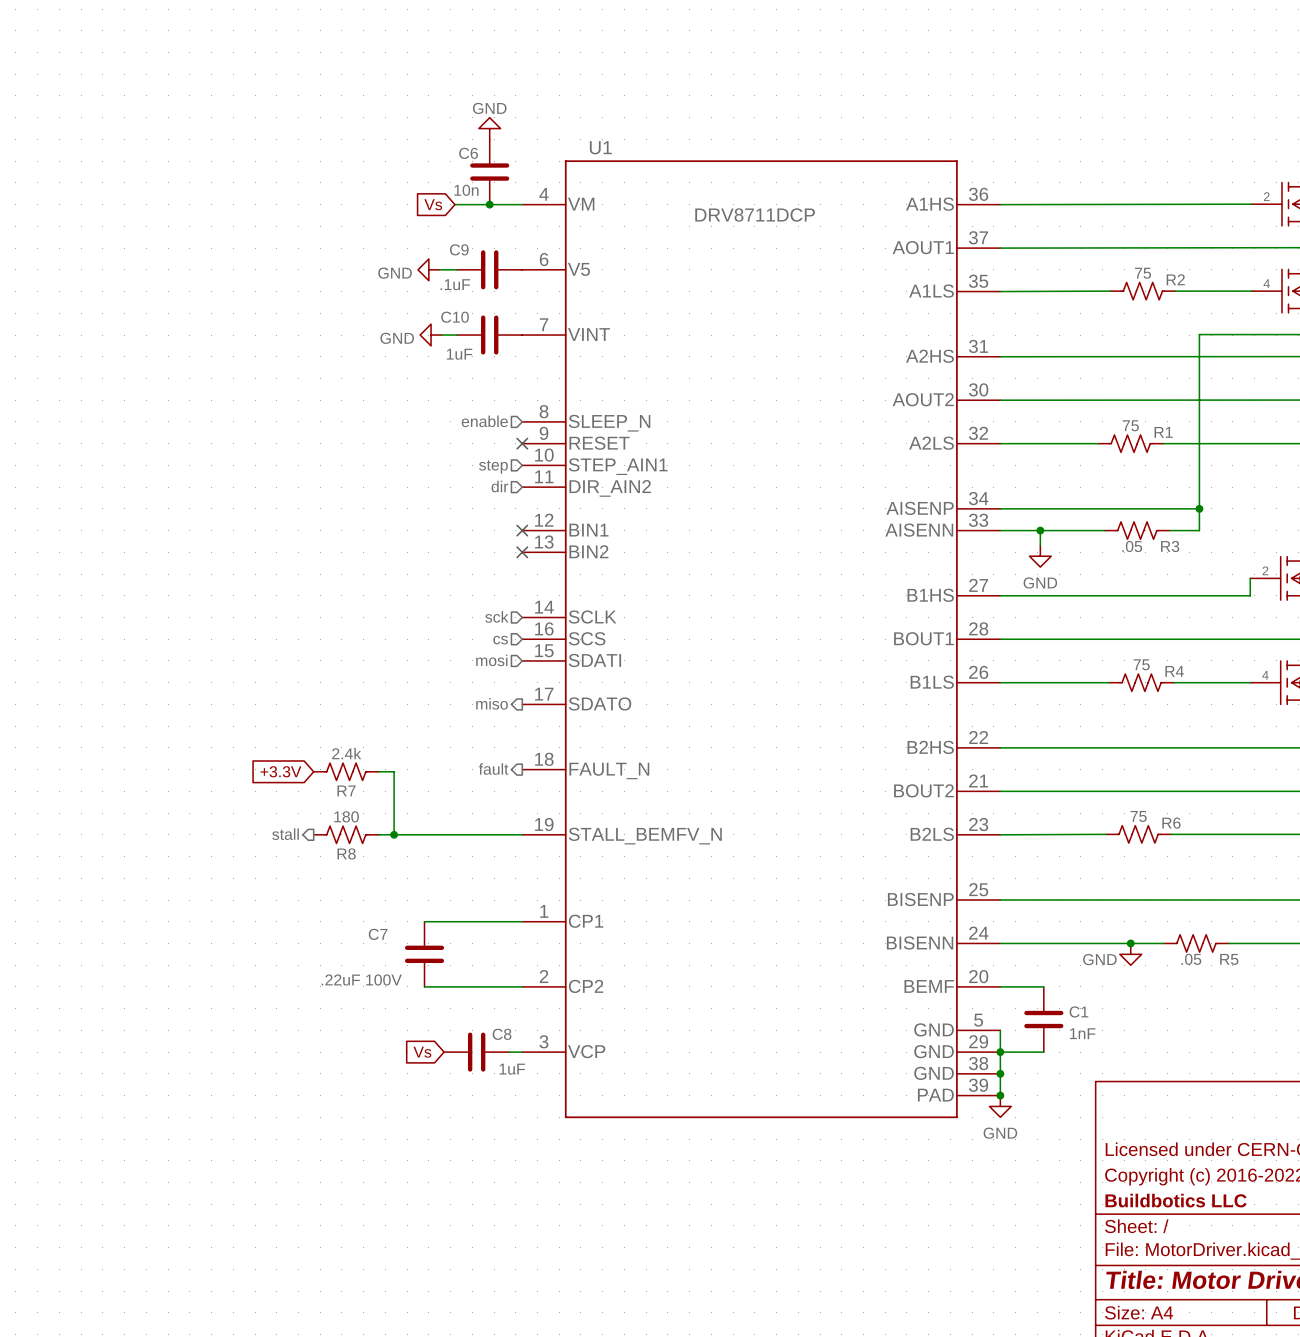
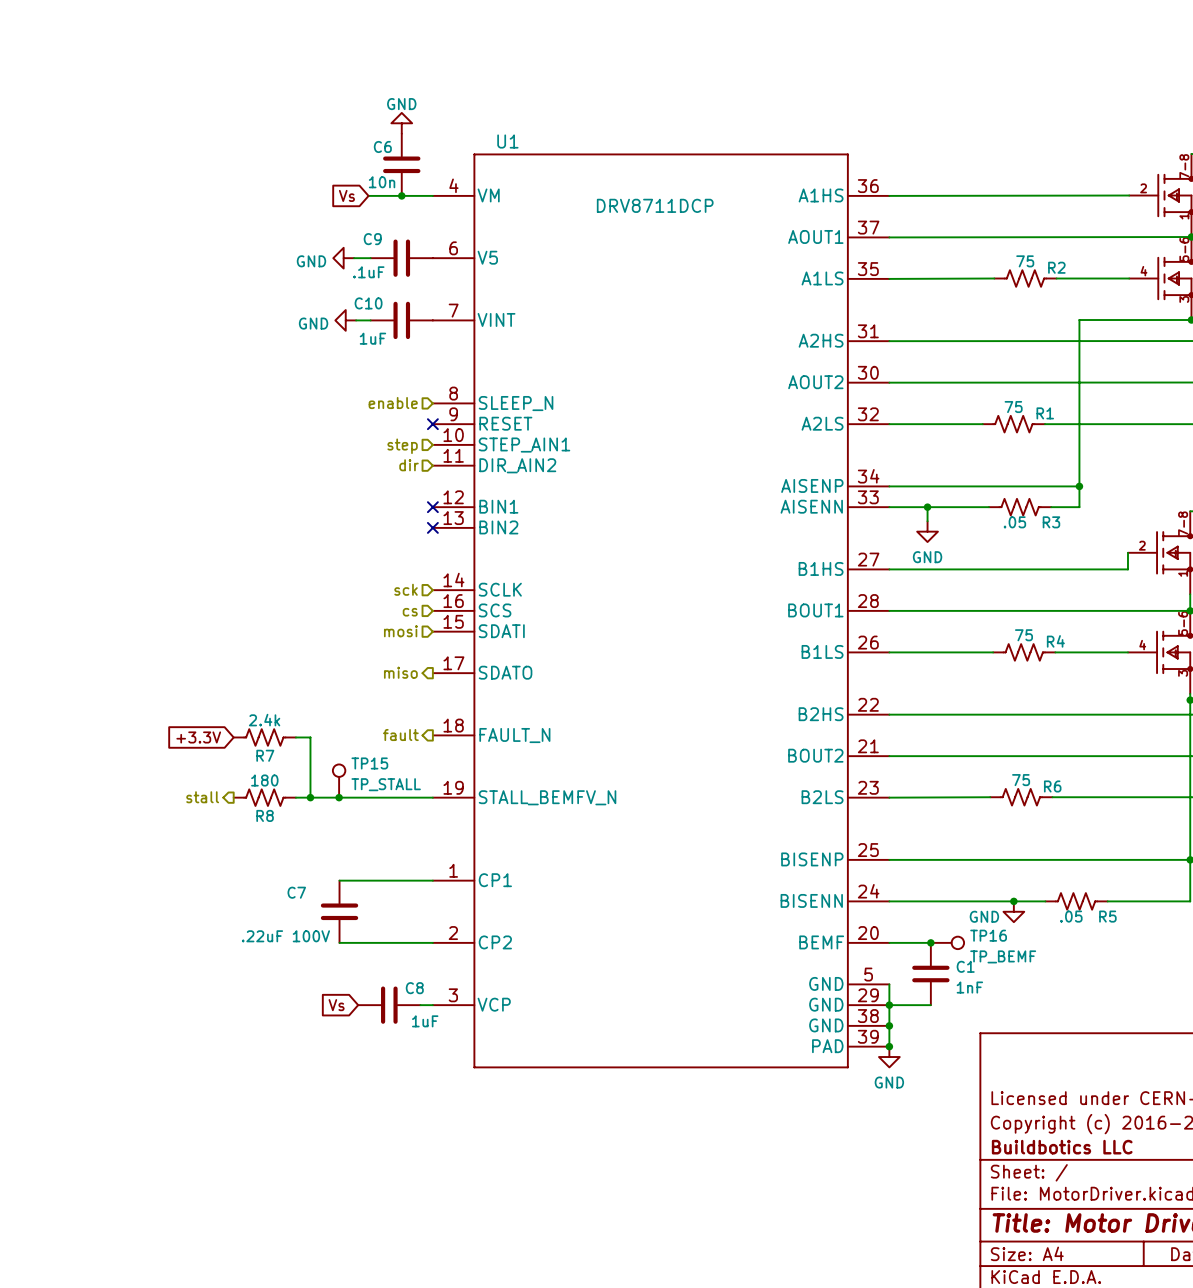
TP15: none -> TP_STALL (339, 781)
junction: none -> (339, 797)
junction: none -> (930, 942)
TP16: none -> TP_BEMF (947, 942)

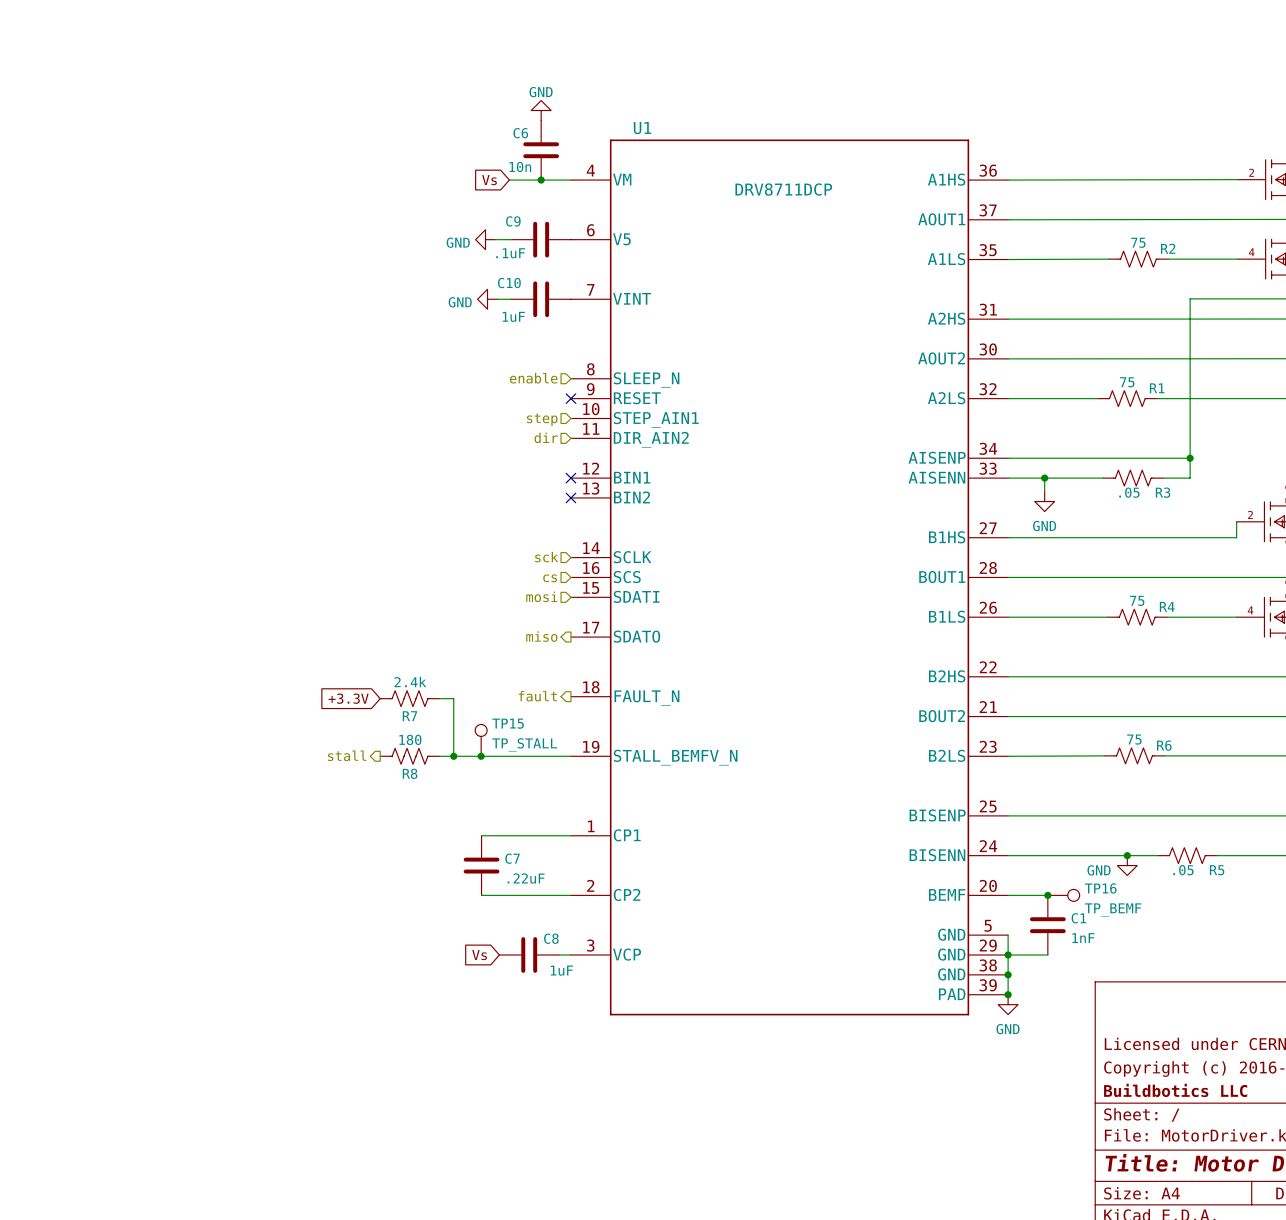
C7 name position: C7 (296, 892) -> C7 (512, 858)
C7 value: .22uF 100V (285, 936) -> .22uF (526, 878)

